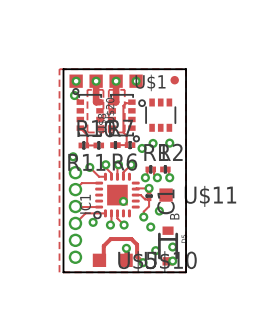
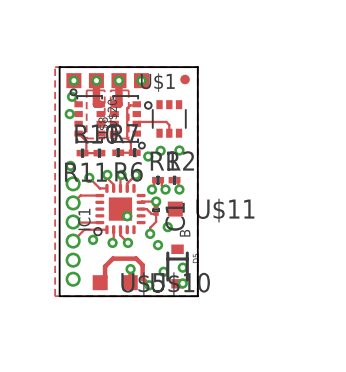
via: none -> (69, 114)
track: none -> (136, 123) (138, 121) (166, 121) (169, 124) (169, 133)

